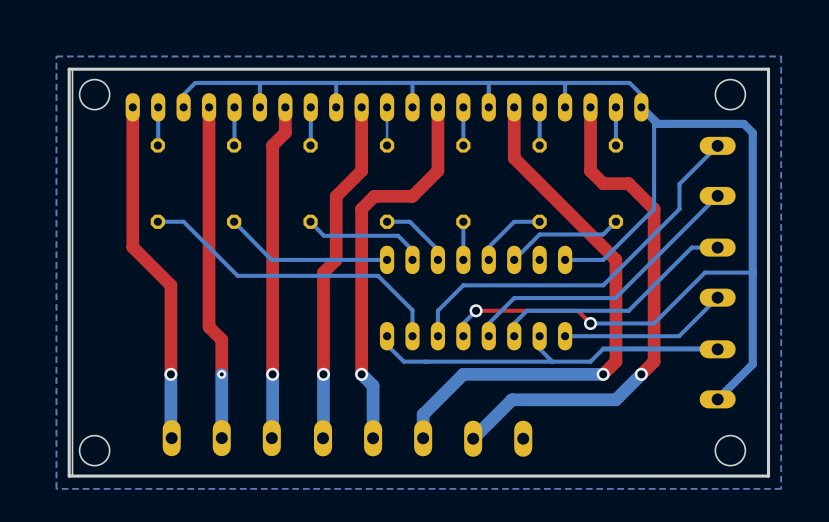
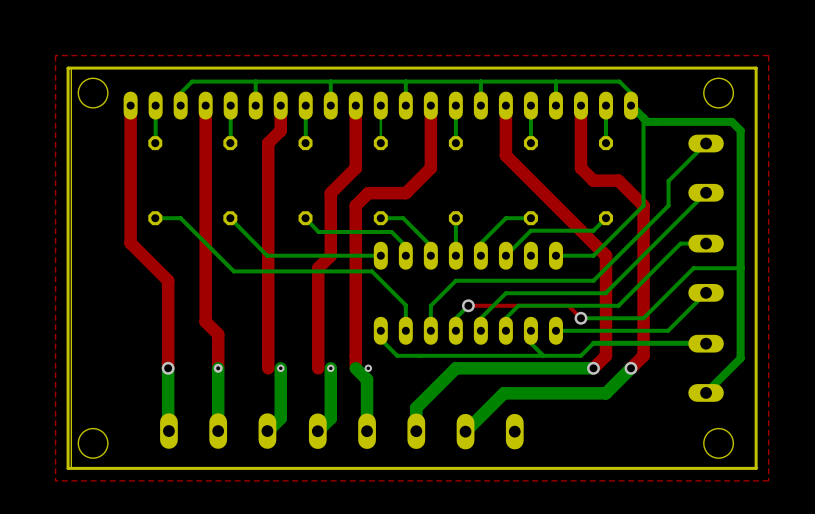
bottom zone outline: (781, 56) (56, 56) (56, 488) (781, 488) (781, 56) -> none
bottom track: (272, 374) (271, 438) -> none
via: (272, 374) -> none
bottom track: none -> (280, 368) (280, 418) (268, 430)
via: none -> (280, 368)
bottom track: (323, 374) (323, 438) -> (330, 368) (330, 418) (317, 431)
via: (323, 374) -> none
via: none -> (330, 368)
via: (361, 374) -> none
via: none -> (368, 368)

